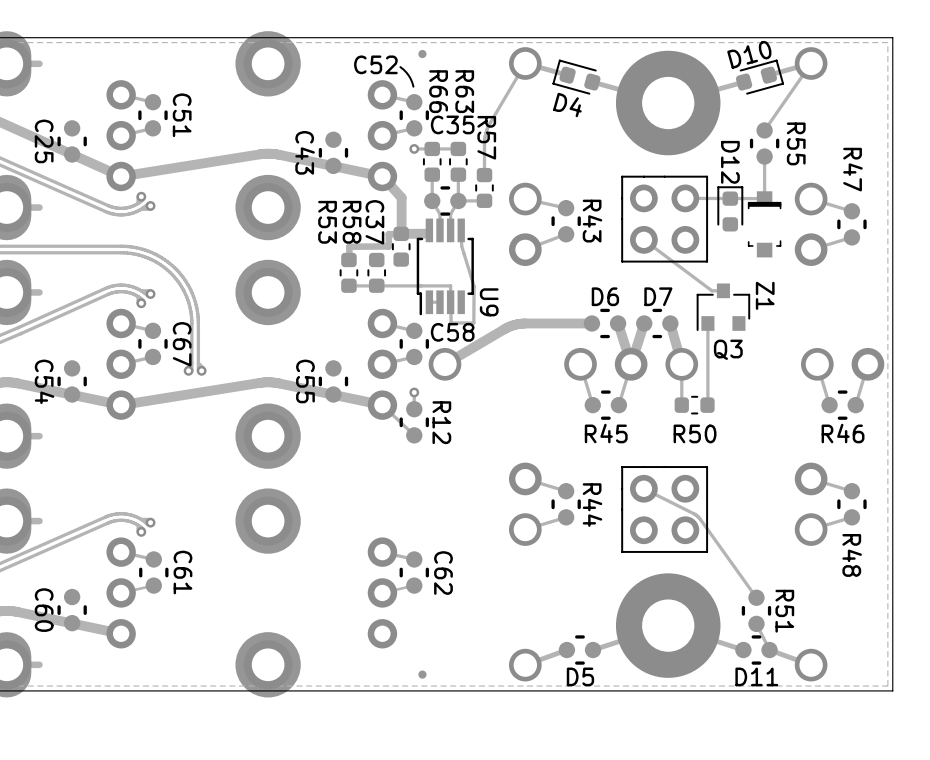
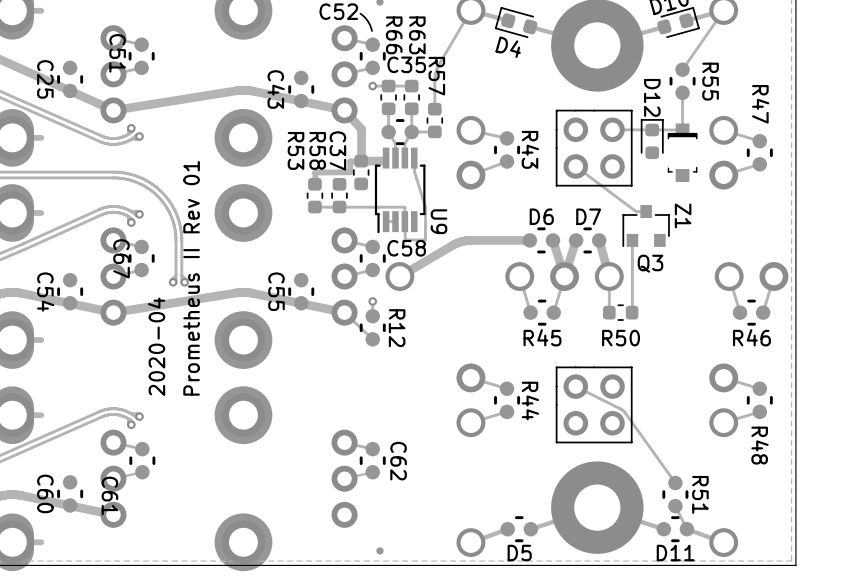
C51 name position: C51 (182, 115) -> C51 (117, 53)
C67 name position: C67 (182, 344) -> C67 (121, 258)
text: none -> Prometheus II Rev 01 (191, 278)
text: none -> 2020-04 (156, 346)
C61 name position: C61 (182, 572) -> C61 (109, 495)

